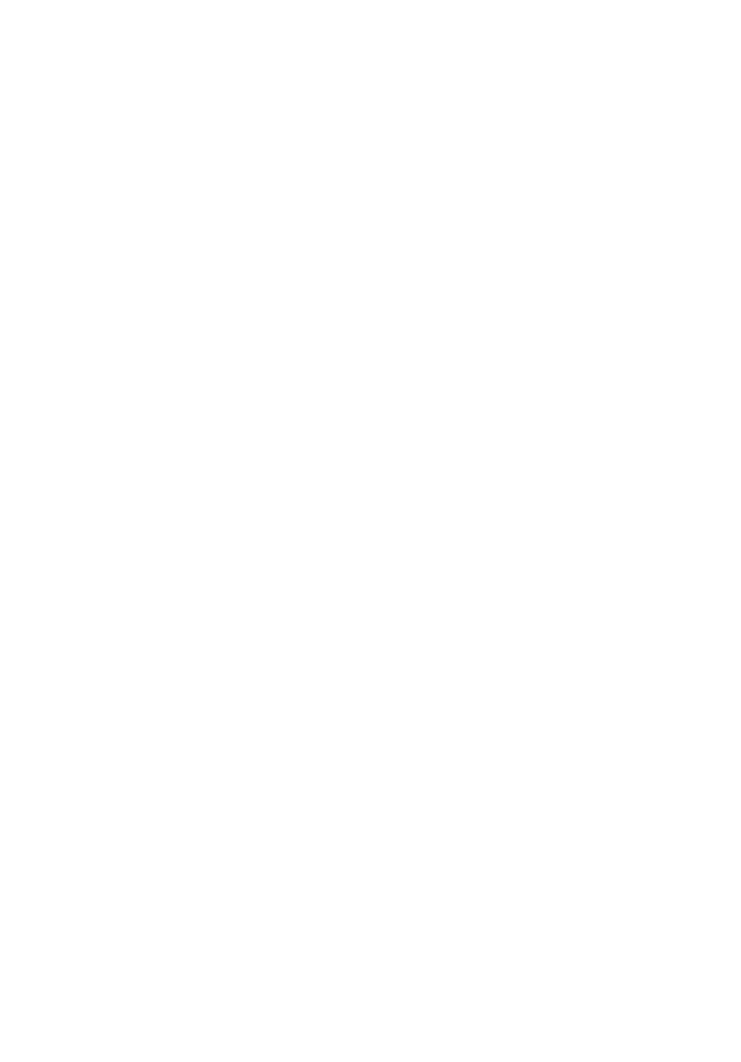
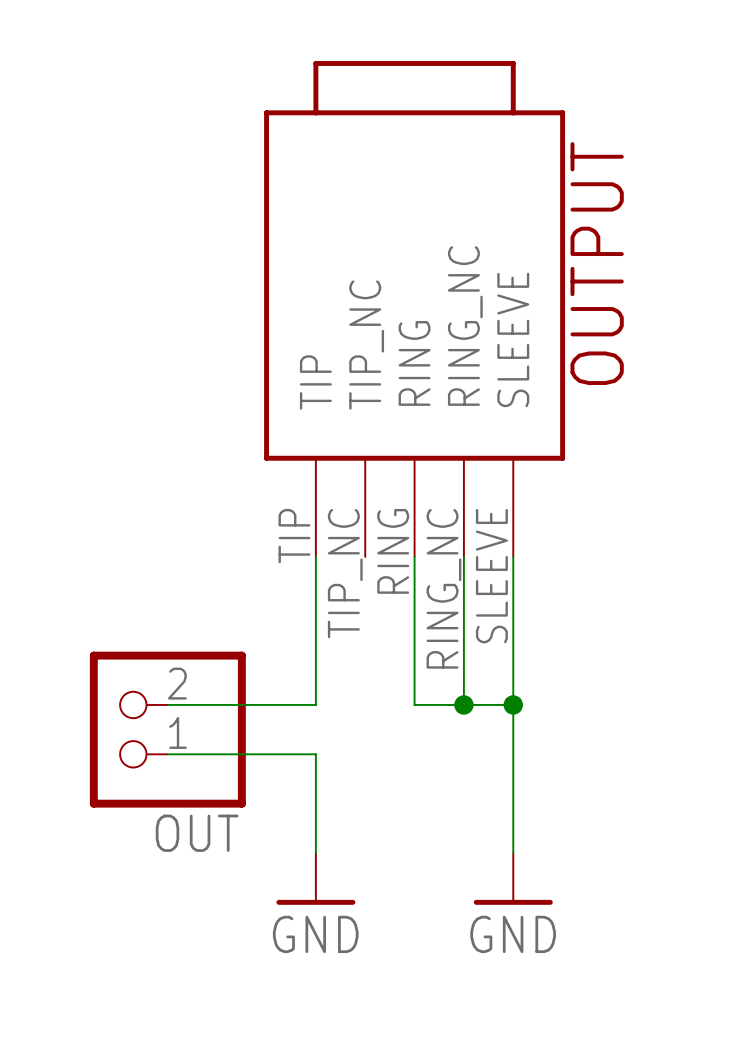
OUTPUT: none -> (414, 308)
wire: none -> (315, 556) (315, 704) (167, 704)
wire: none -> (414, 556) (414, 704) (513, 704)
wire: none -> (463, 556) (463, 704)
wire: none -> (513, 556) (513, 853)
junction: none -> (463, 704)
junction: none -> (513, 704)
OUT: none -> (167, 729)
wire: none -> (167, 754) (315, 754) (315, 853)
power symbol: none -> GND (315, 878)
power symbol: none -> GND (513, 878)

